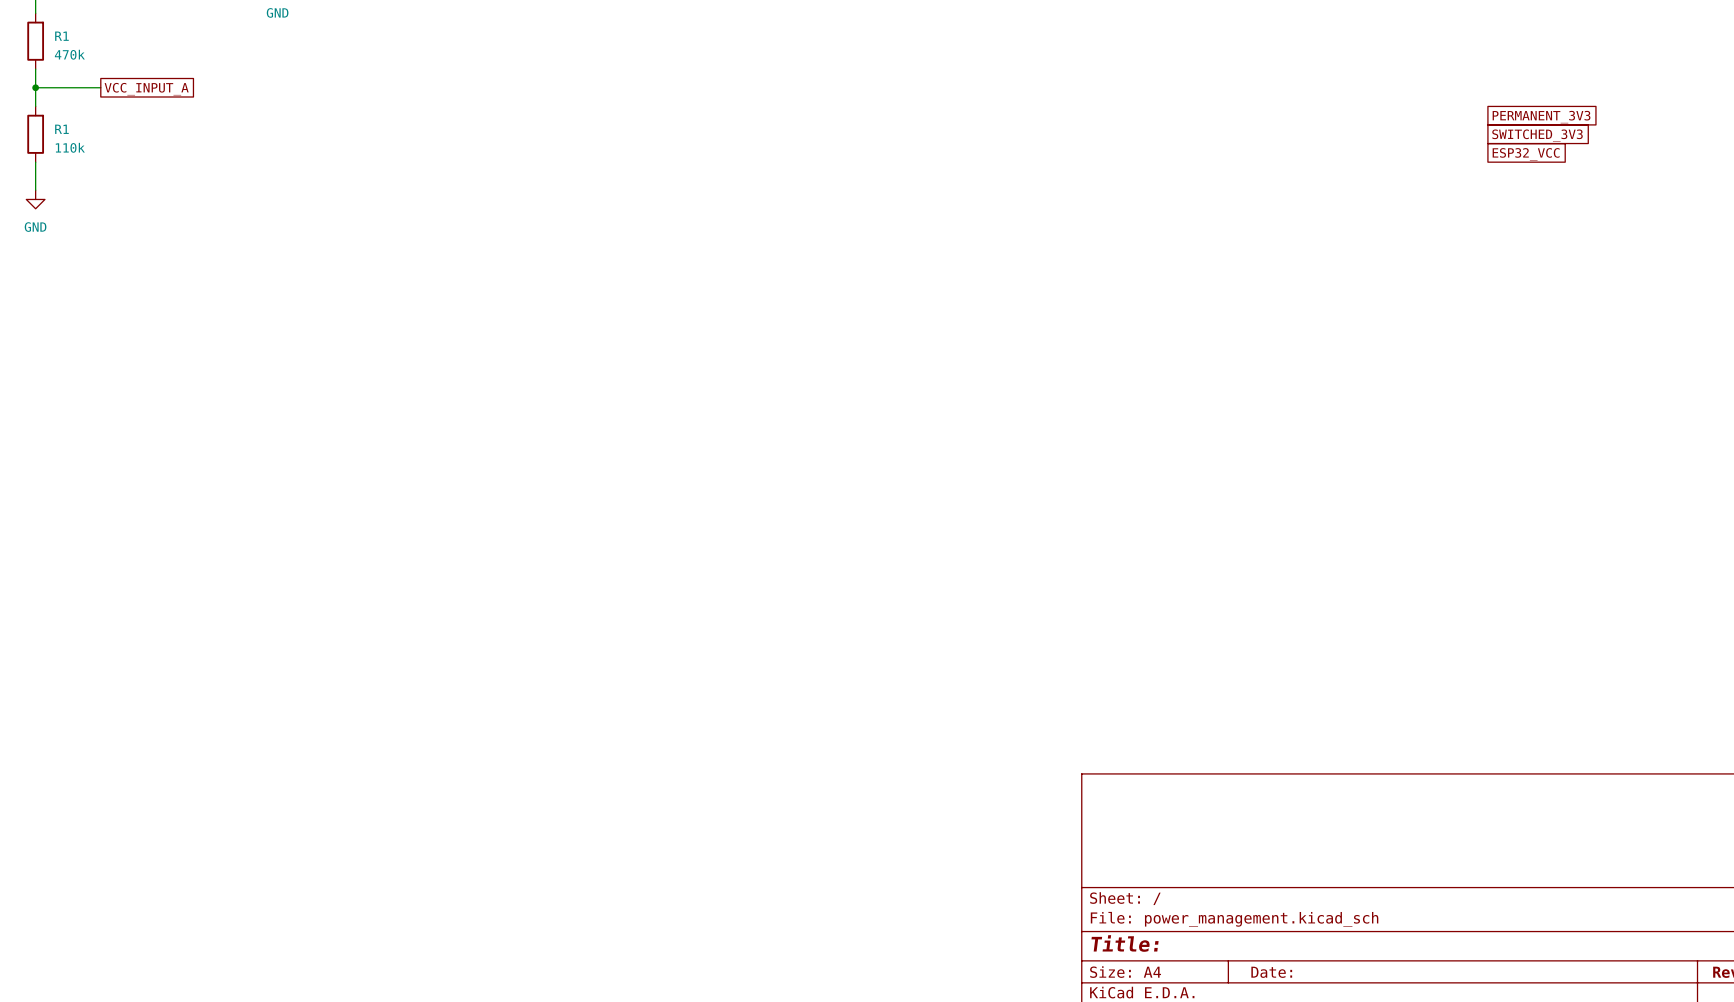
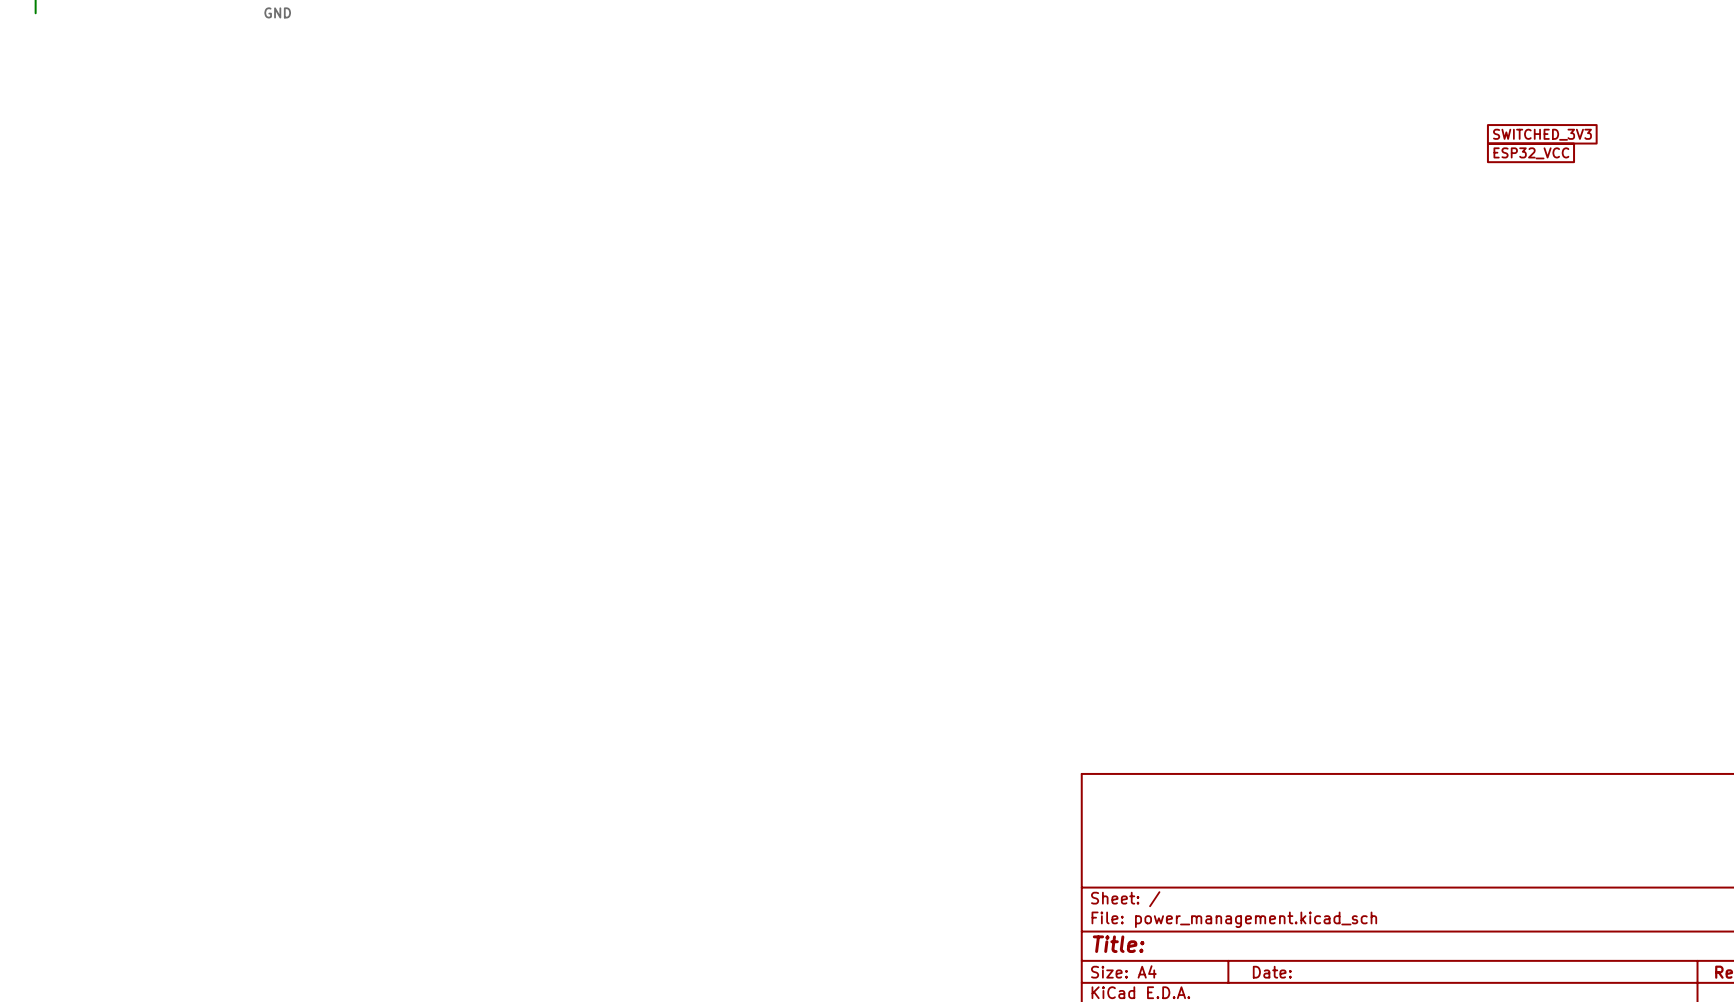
R1: 470k (35, 41) -> none
wire: (35, 69) (35, 106) -> none
wire: (35, 87) (100, 87) -> none
junction: (35, 87) -> none
global label: VCC_INPUT_A (146, 89) -> none
global label: PERMANENT_3V3 (1541, 117) -> none
R1: 110k (35, 134) -> none
wire: (35, 162) (35, 190) -> none
power symbol: GND (35, 199) -> none

